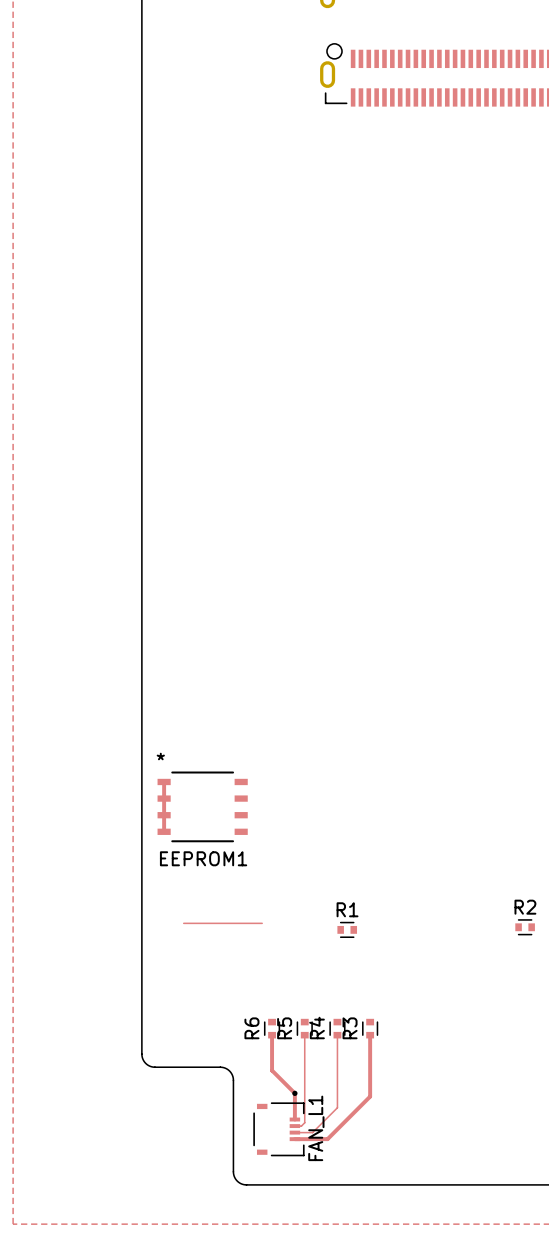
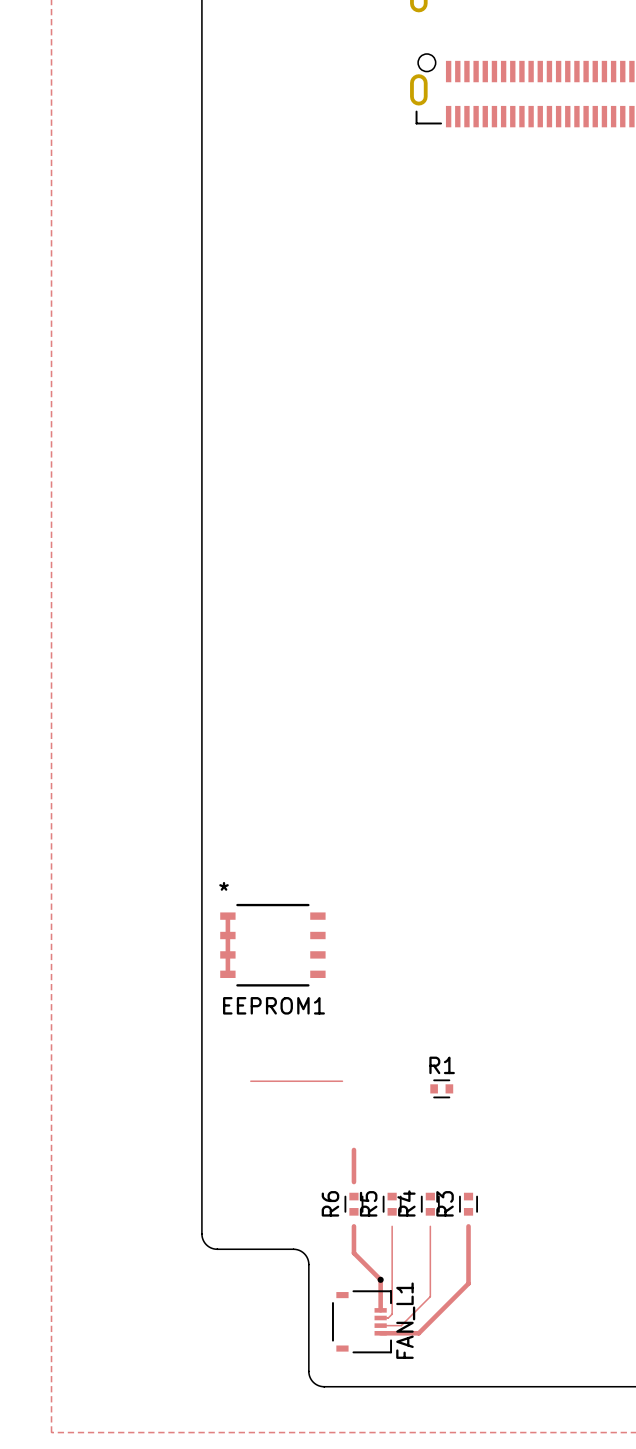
track: none -> (353, 1149) (353, 1182)
track: (272, 1035) (272, 1047) -> none
track: (304, 1035) (304, 1047) -> none
track: (337, 1035) (337, 1047) -> none
track: (370, 1035) (370, 1047) -> none

